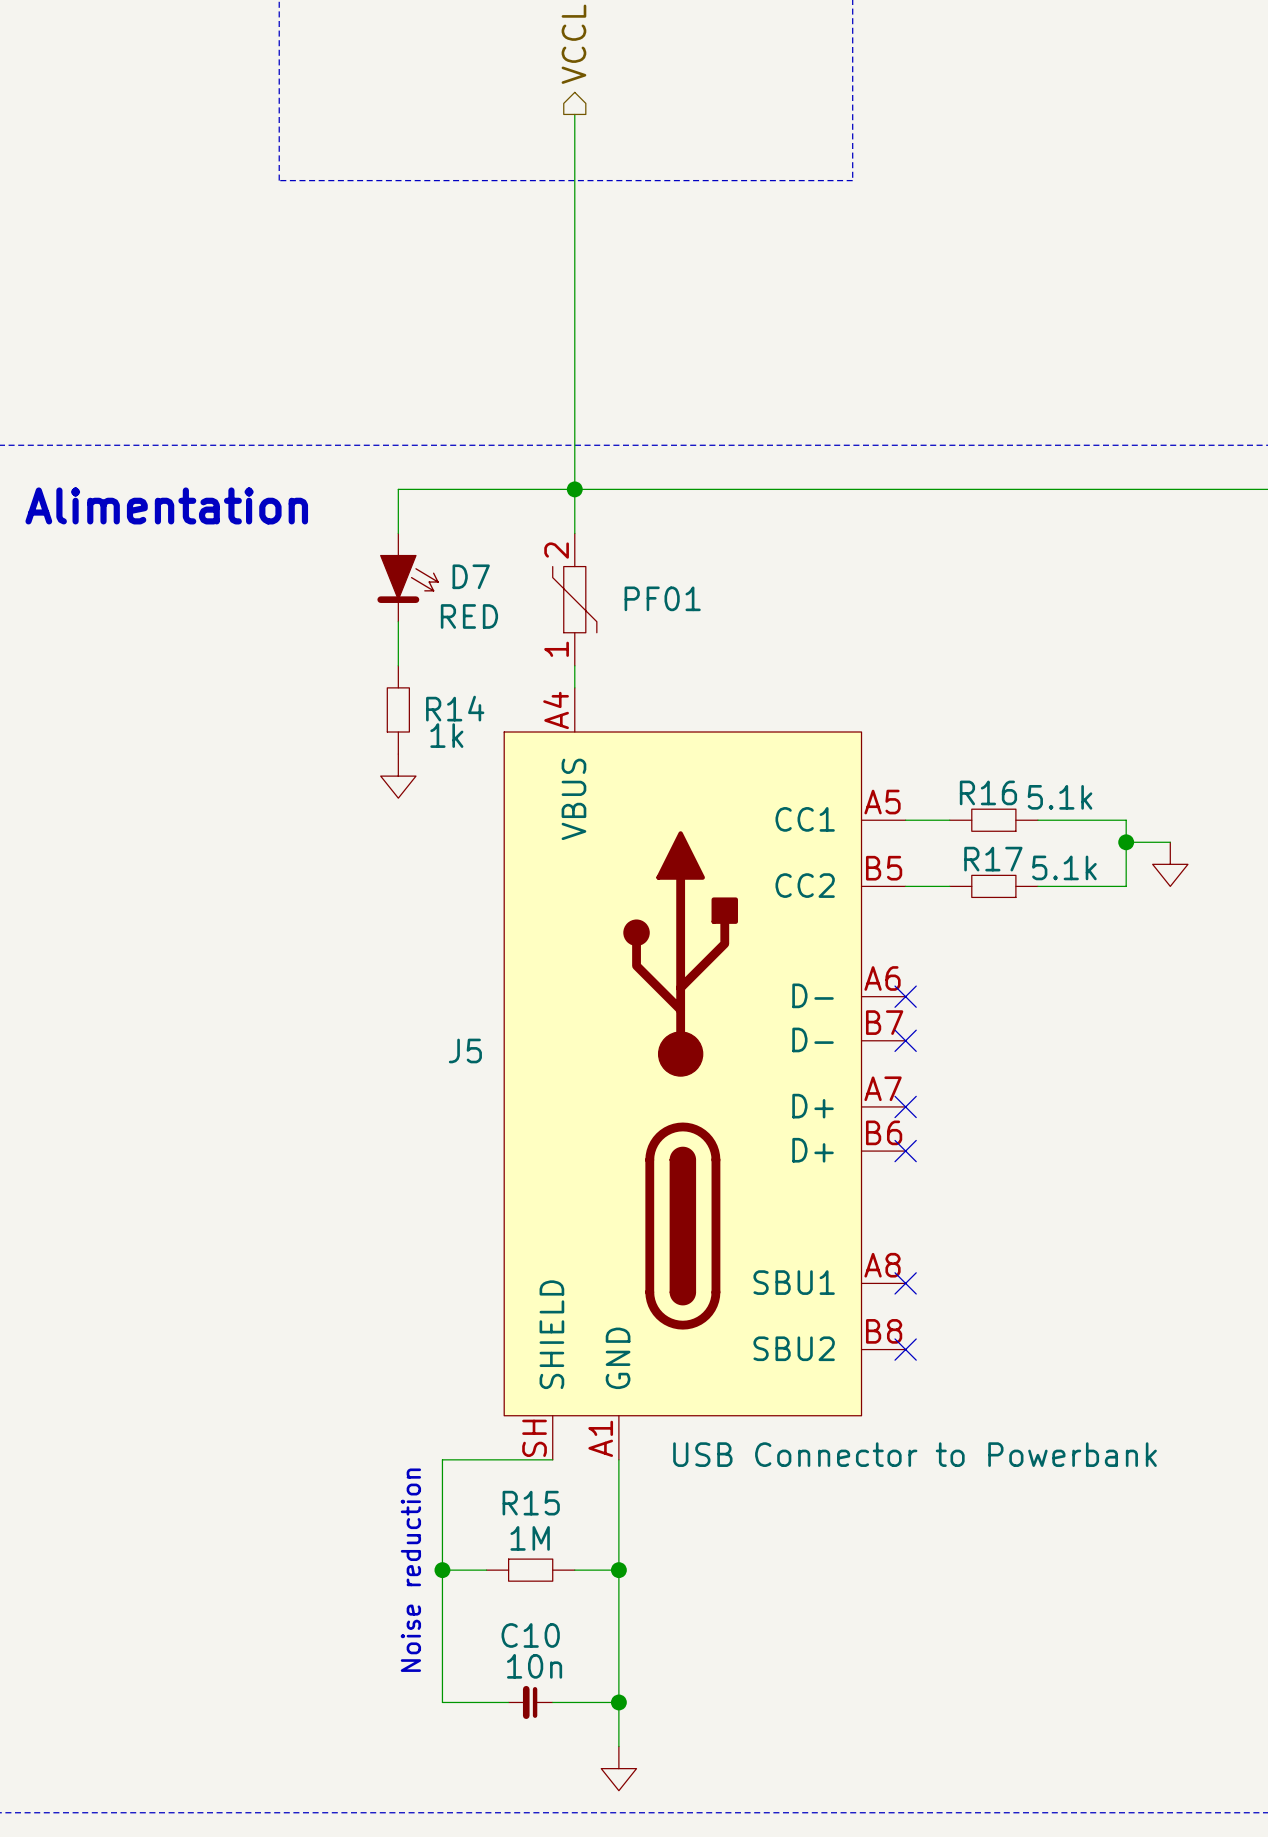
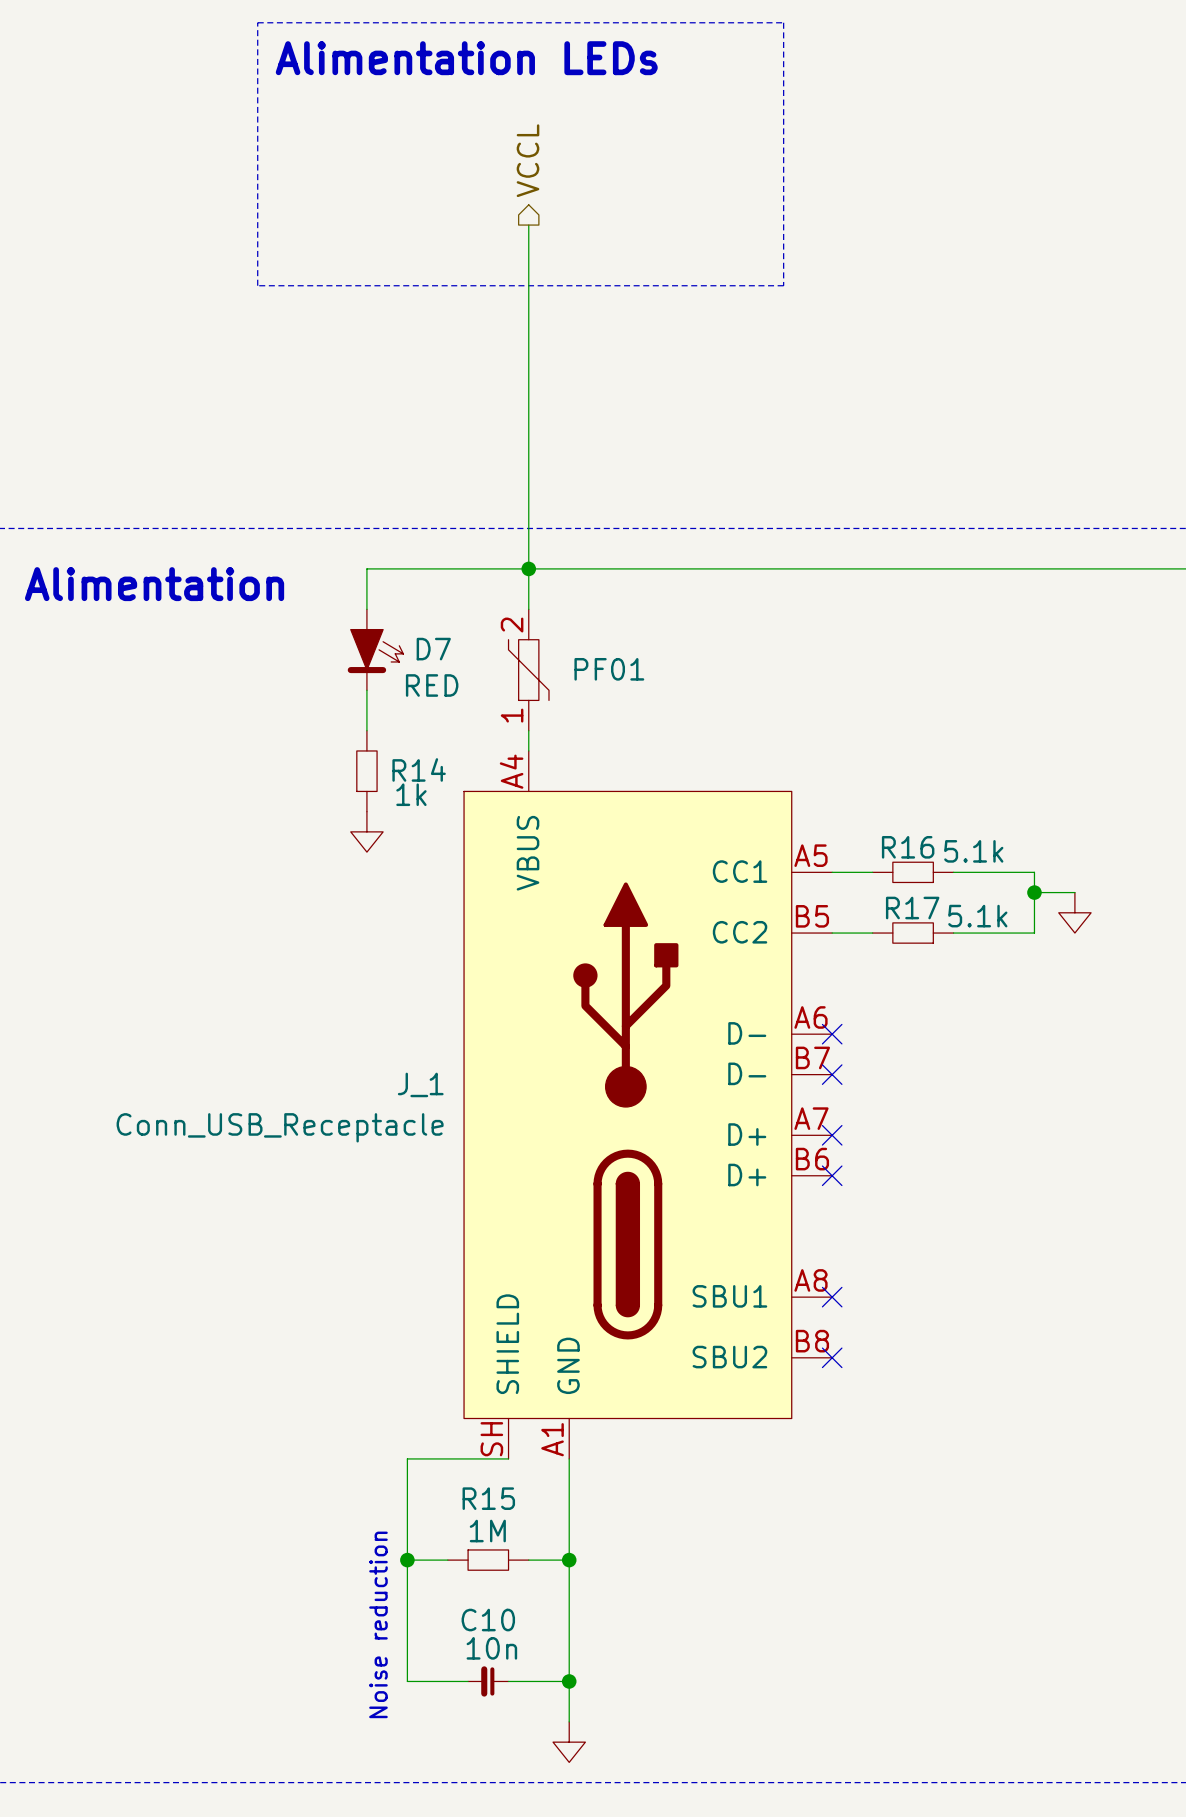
J5 name: J5 (465, 1050) -> J_1 (420, 1084)
J5 value: USB Connector to Powerbank (915, 1454) -> Conn_USB_Receptacle (280, 1127)
text position: Noise reduction (410, 1570) -> Noise reduction (378, 1624)

